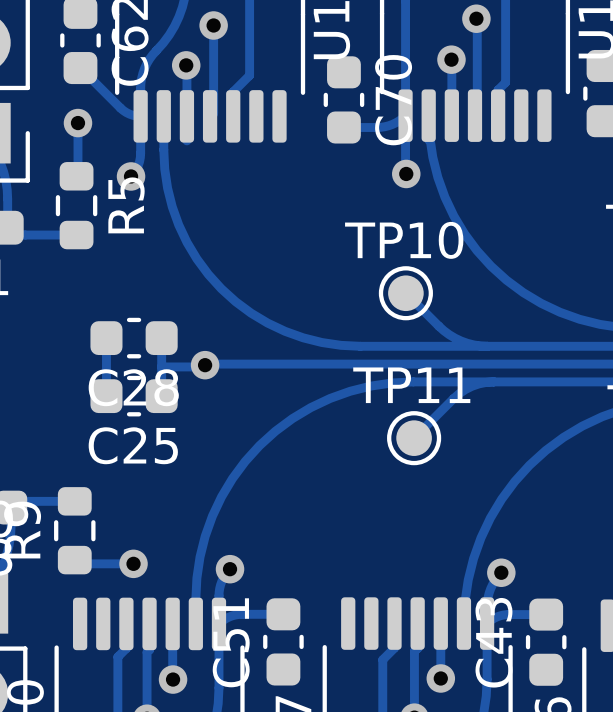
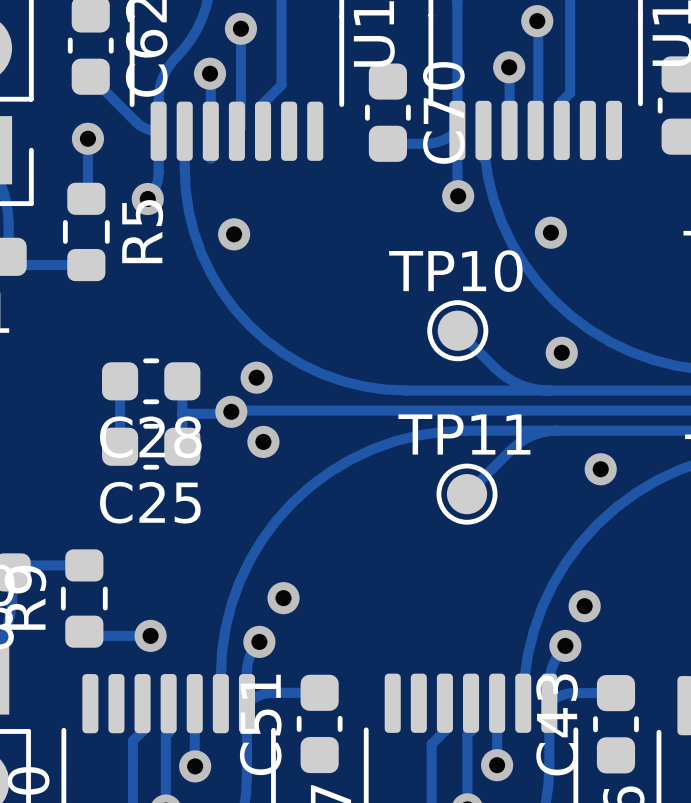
via: none -> (550, 232)
via: none -> (234, 234)
via: none -> (561, 352)
via: none -> (256, 377)
via: none -> (263, 441)
via: none -> (600, 469)
via: none -> (283, 598)
via: none -> (584, 606)

